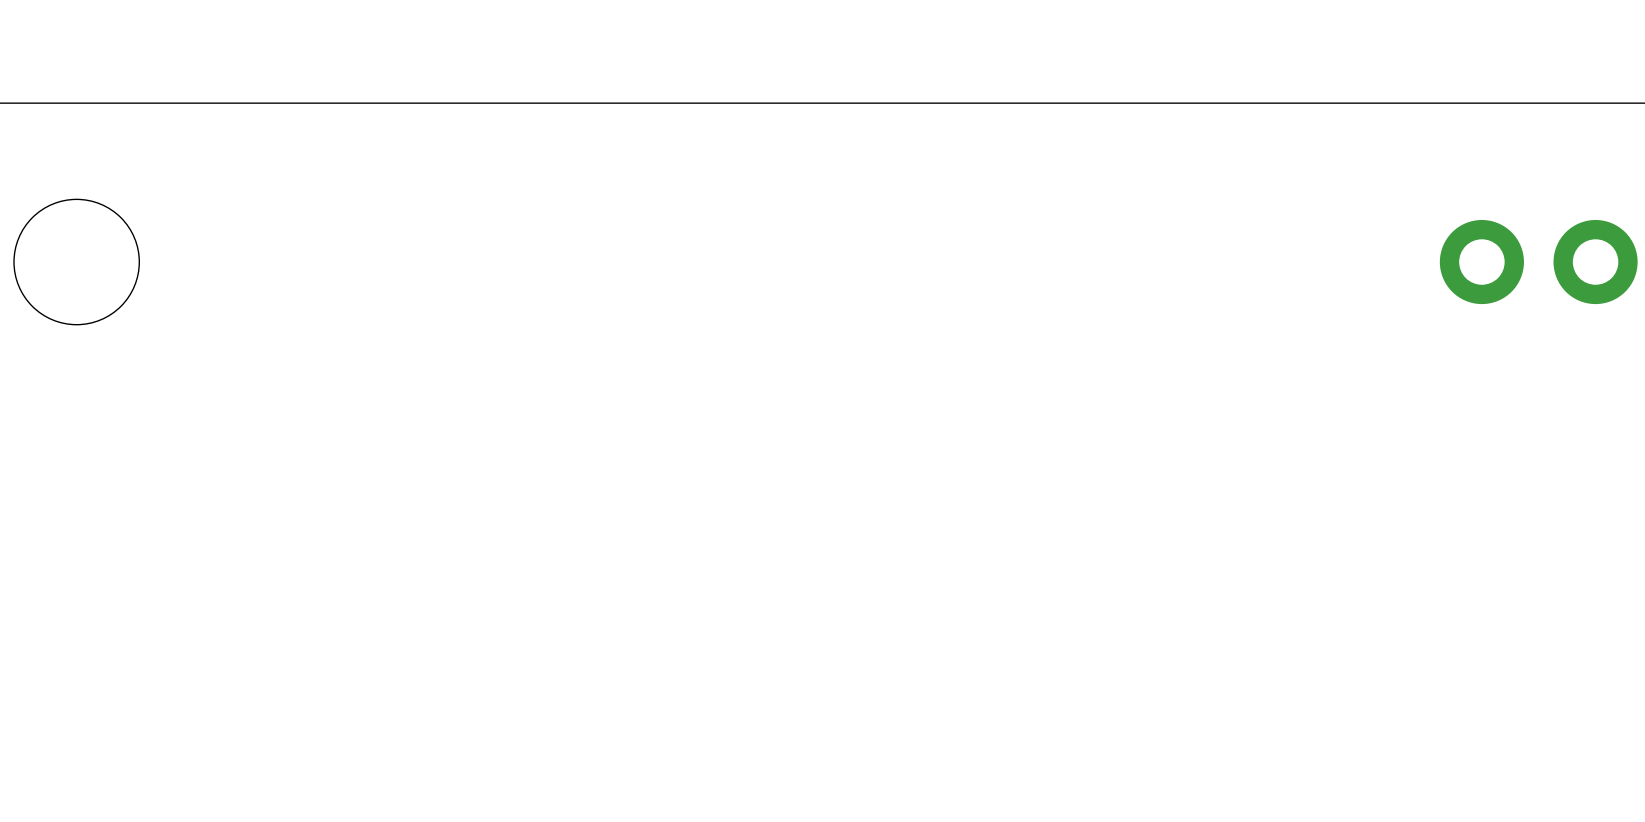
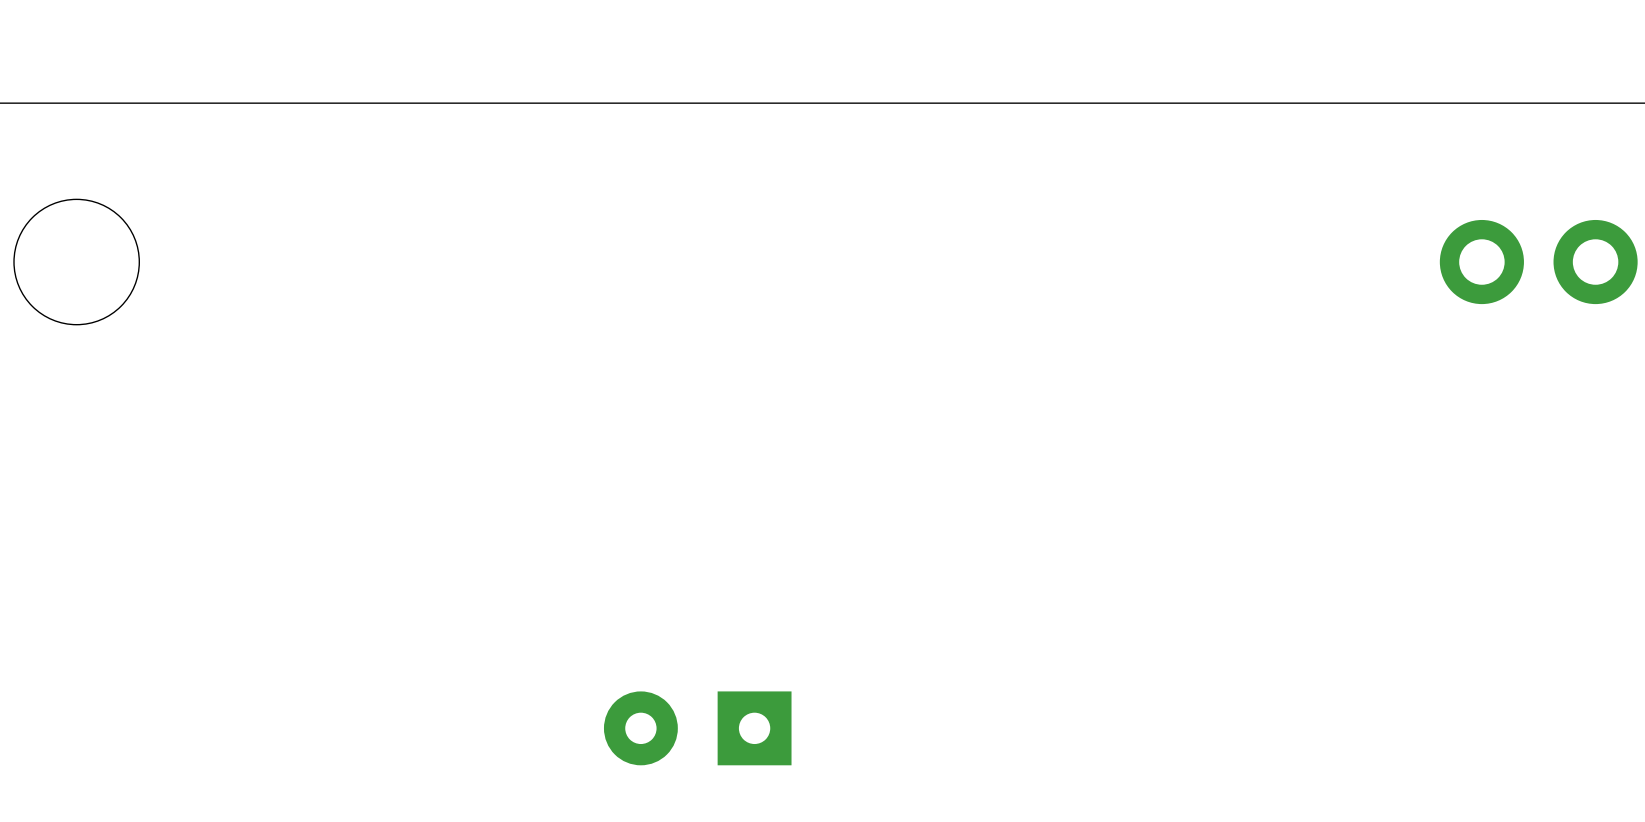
part: none -> (697, 728)

